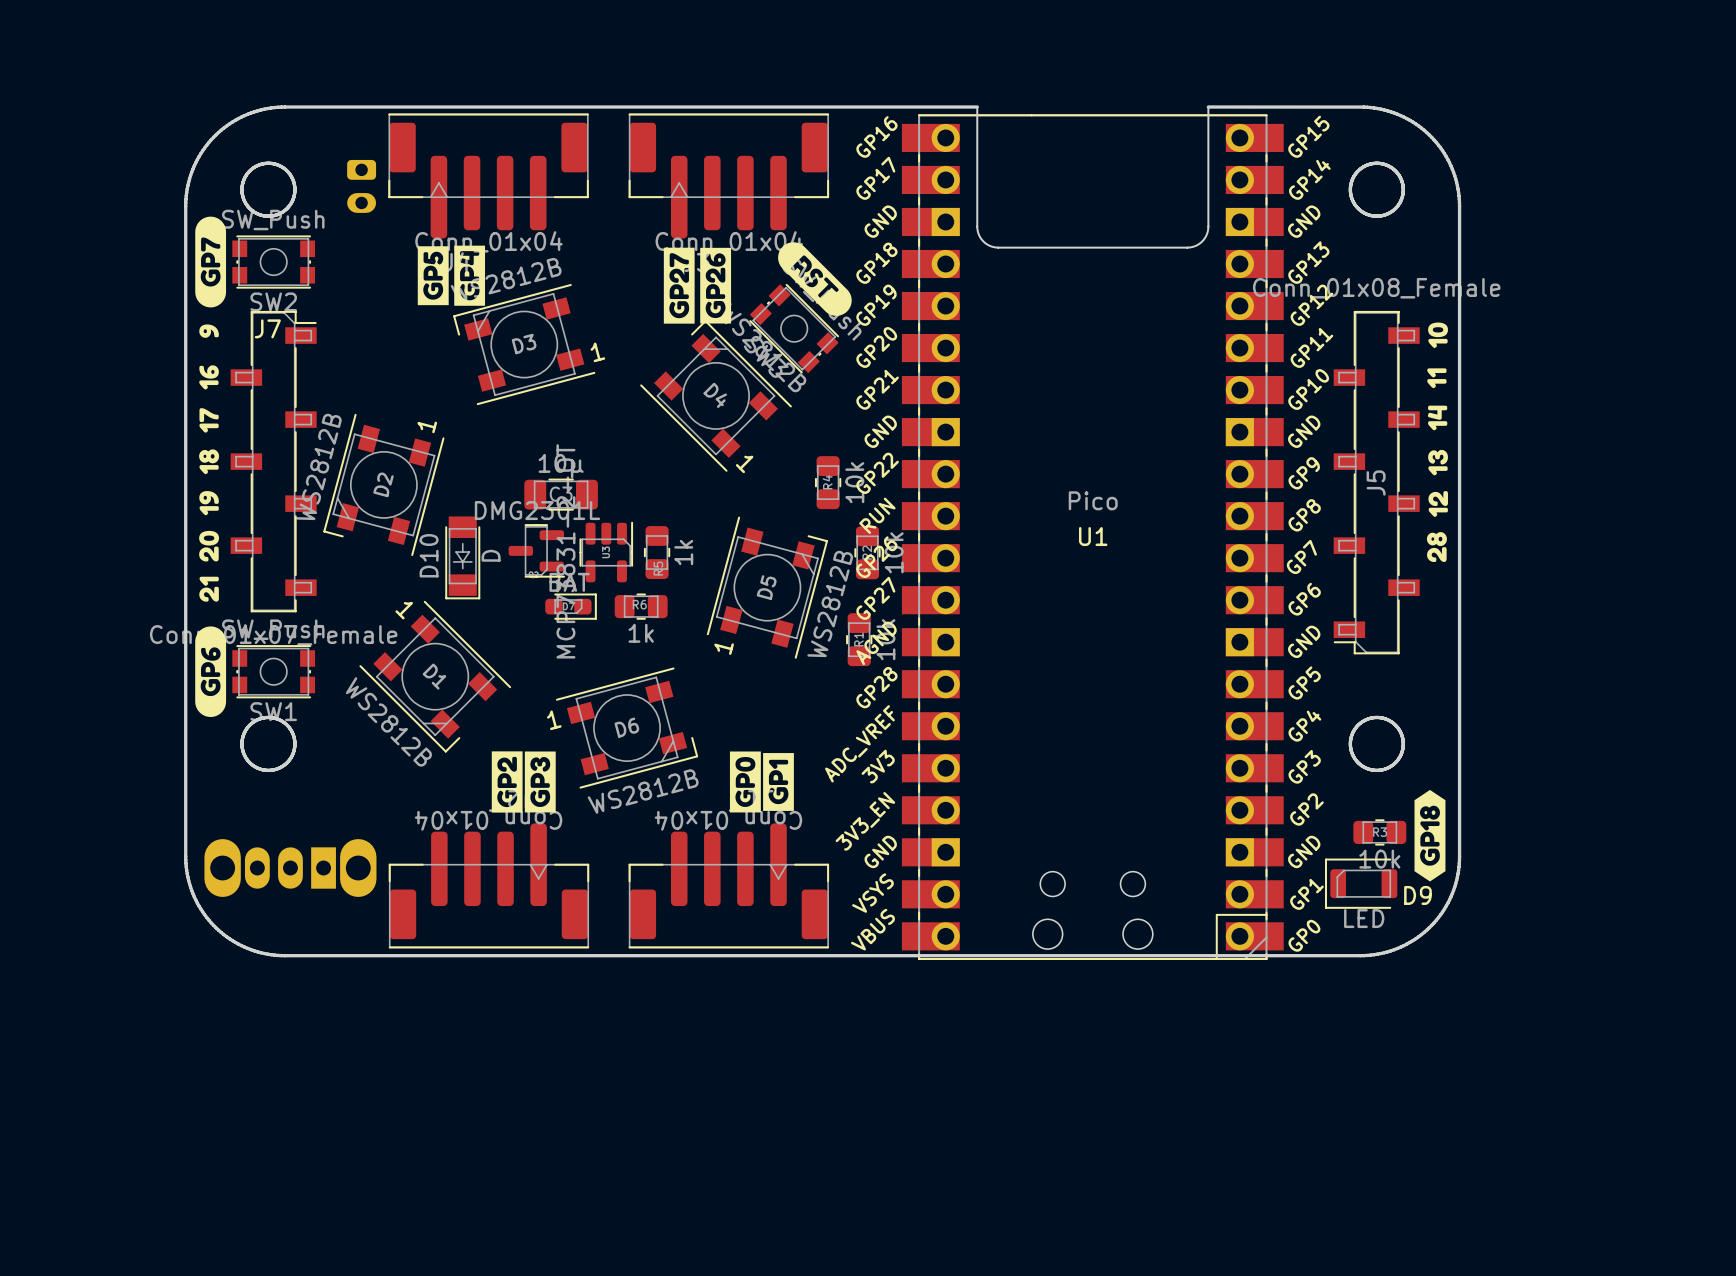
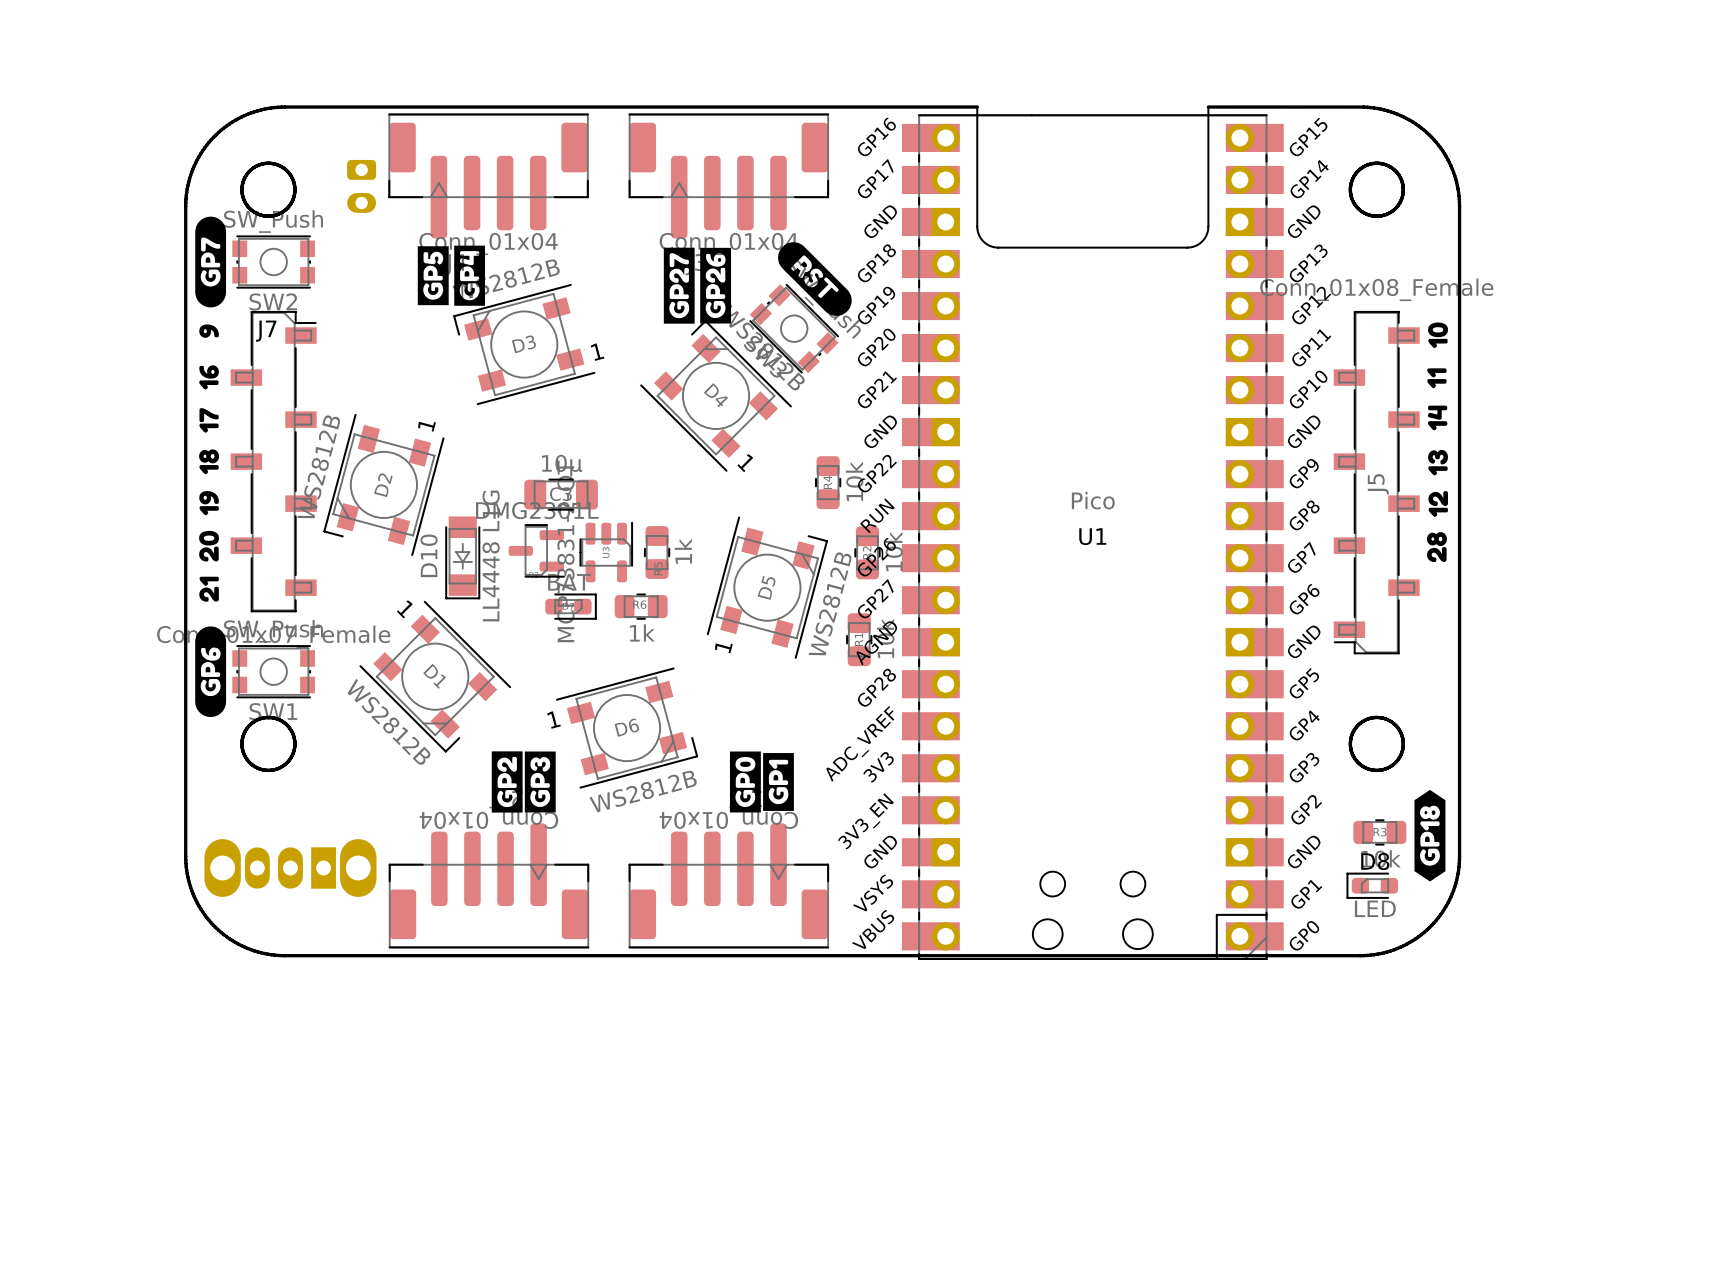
D10 value: D (491, 555) -> LL4448 L1G (491, 555)
D9: LED (1361, 883) -> none
D8: none -> LED (1372, 885)

